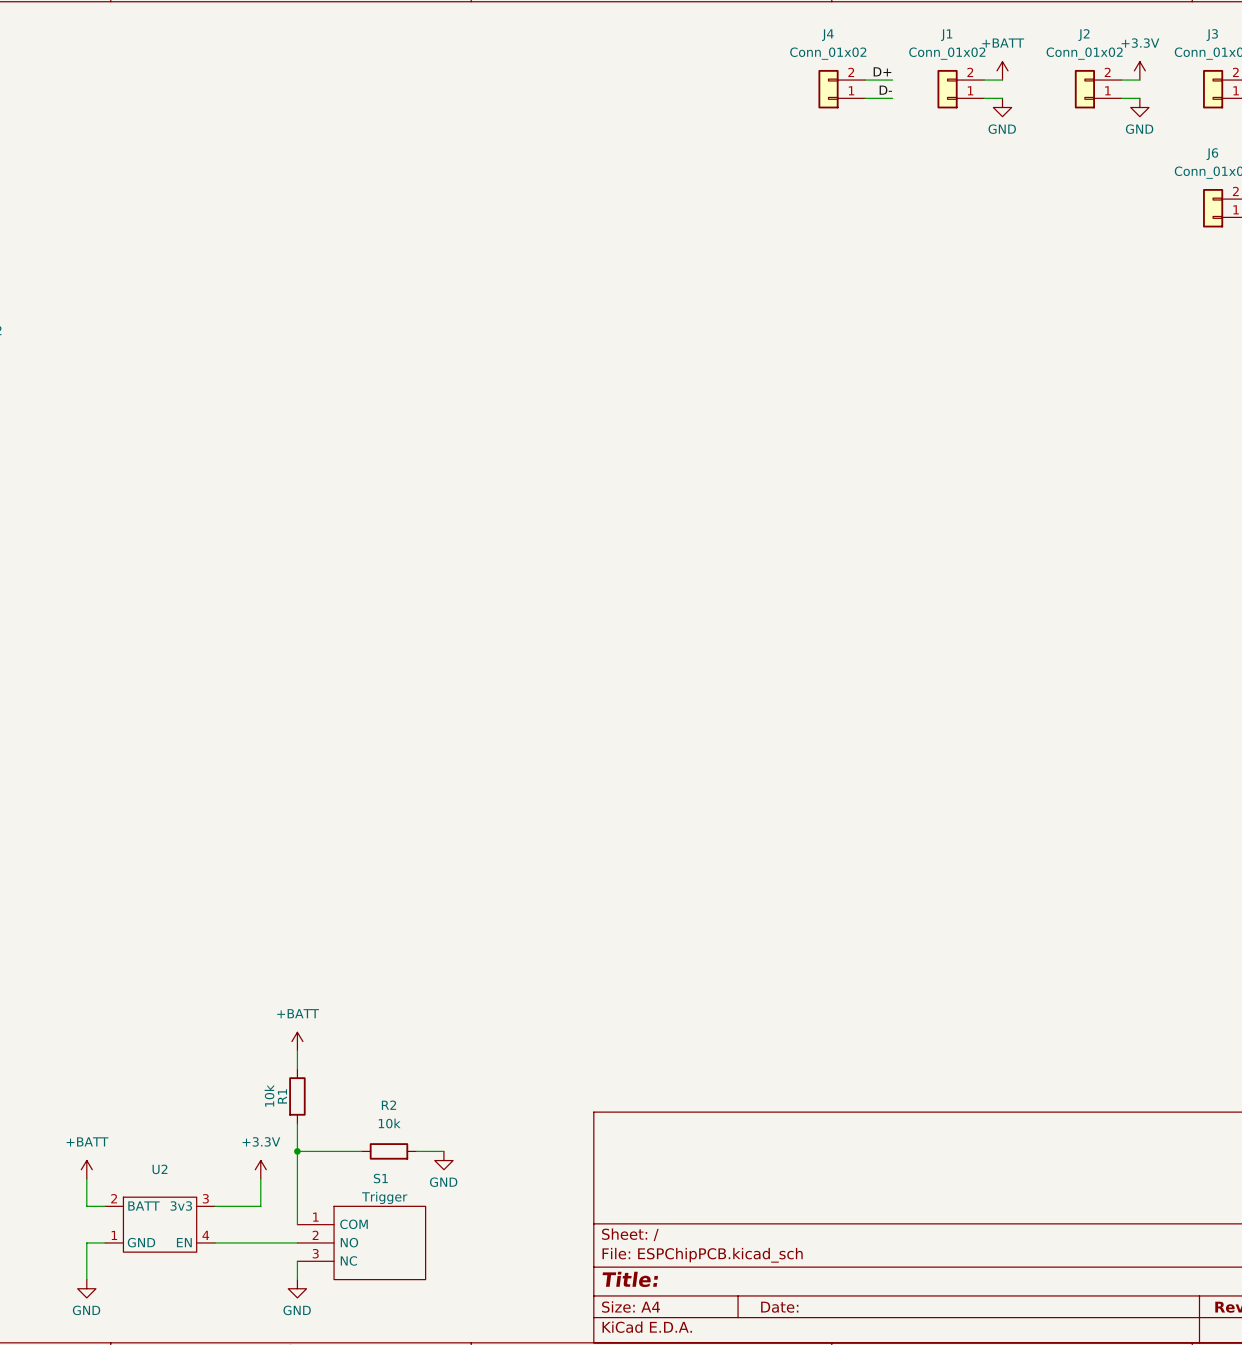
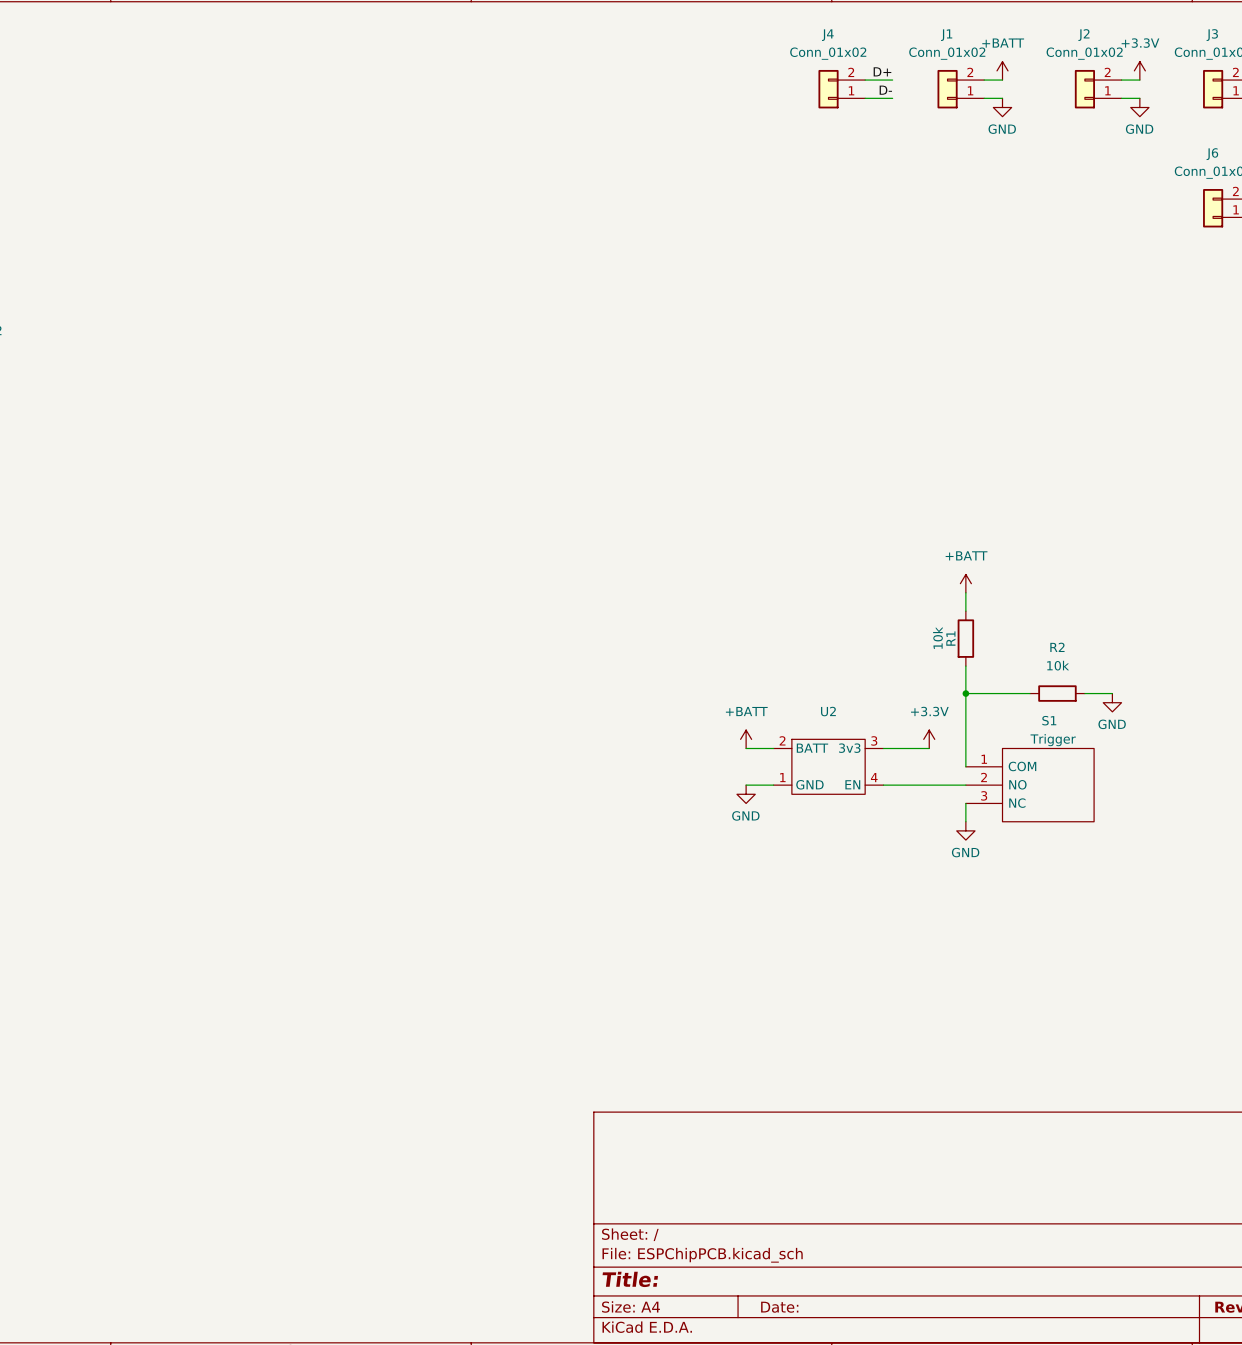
power symbol: none -> +BATT (965, 583)
wire: none -> (965, 592) (965, 611)
wire: none -> (965, 666) (965, 766)
wire: none -> (965, 693) (1029, 693)
junction: none -> (965, 693)
wire: none -> (1084, 693) (1112, 693)
power symbol: none -> GND (1112, 702)
power symbol: none -> +BATT (746, 739)
power symbol: none -> +3.3V (929, 739)
wire: none -> (746, 748) (773, 748)
wire: none -> (883, 748) (929, 748)
wire: none -> (746, 785) (773, 785)
wire: none -> (883, 785) (965, 785)
power symbol: none -> GND (746, 794)
wire: none -> (965, 803) (965, 821)
power symbol: none -> GND (965, 830)
power symbol: +BATT (297, 1041) -> none
wire: (297, 1050) (297, 1068) -> none
R1 position: (297, 1096) -> (965, 638)
wire: (297, 1123) (297, 1224) -> none
wire: (297, 1151) (361, 1151) -> none
junction: (297, 1151) -> none
R2 position: (388, 1151) -> (1057, 693)
wire: (416, 1151) (443, 1151) -> none
power symbol: GND (443, 1160) -> none
power symbol: +BATT (86, 1169) -> none
power symbol: +3.3V (260, 1169) -> none
wire: (86, 1178) (86, 1206) (105, 1206) -> none
wire: (260, 1178) (260, 1206) (215, 1206) -> none
U2 position: (160, 1224) -> (828, 766)
wire: (105, 1242) (86, 1242) (86, 1279) -> none
wire: (215, 1242) (297, 1242) -> none
S1 position: (361, 1242) -> (1030, 785)
wire: (297, 1261) (297, 1279) -> none
power symbol: GND (86, 1288) -> none
power symbol: GND (297, 1288) -> none

